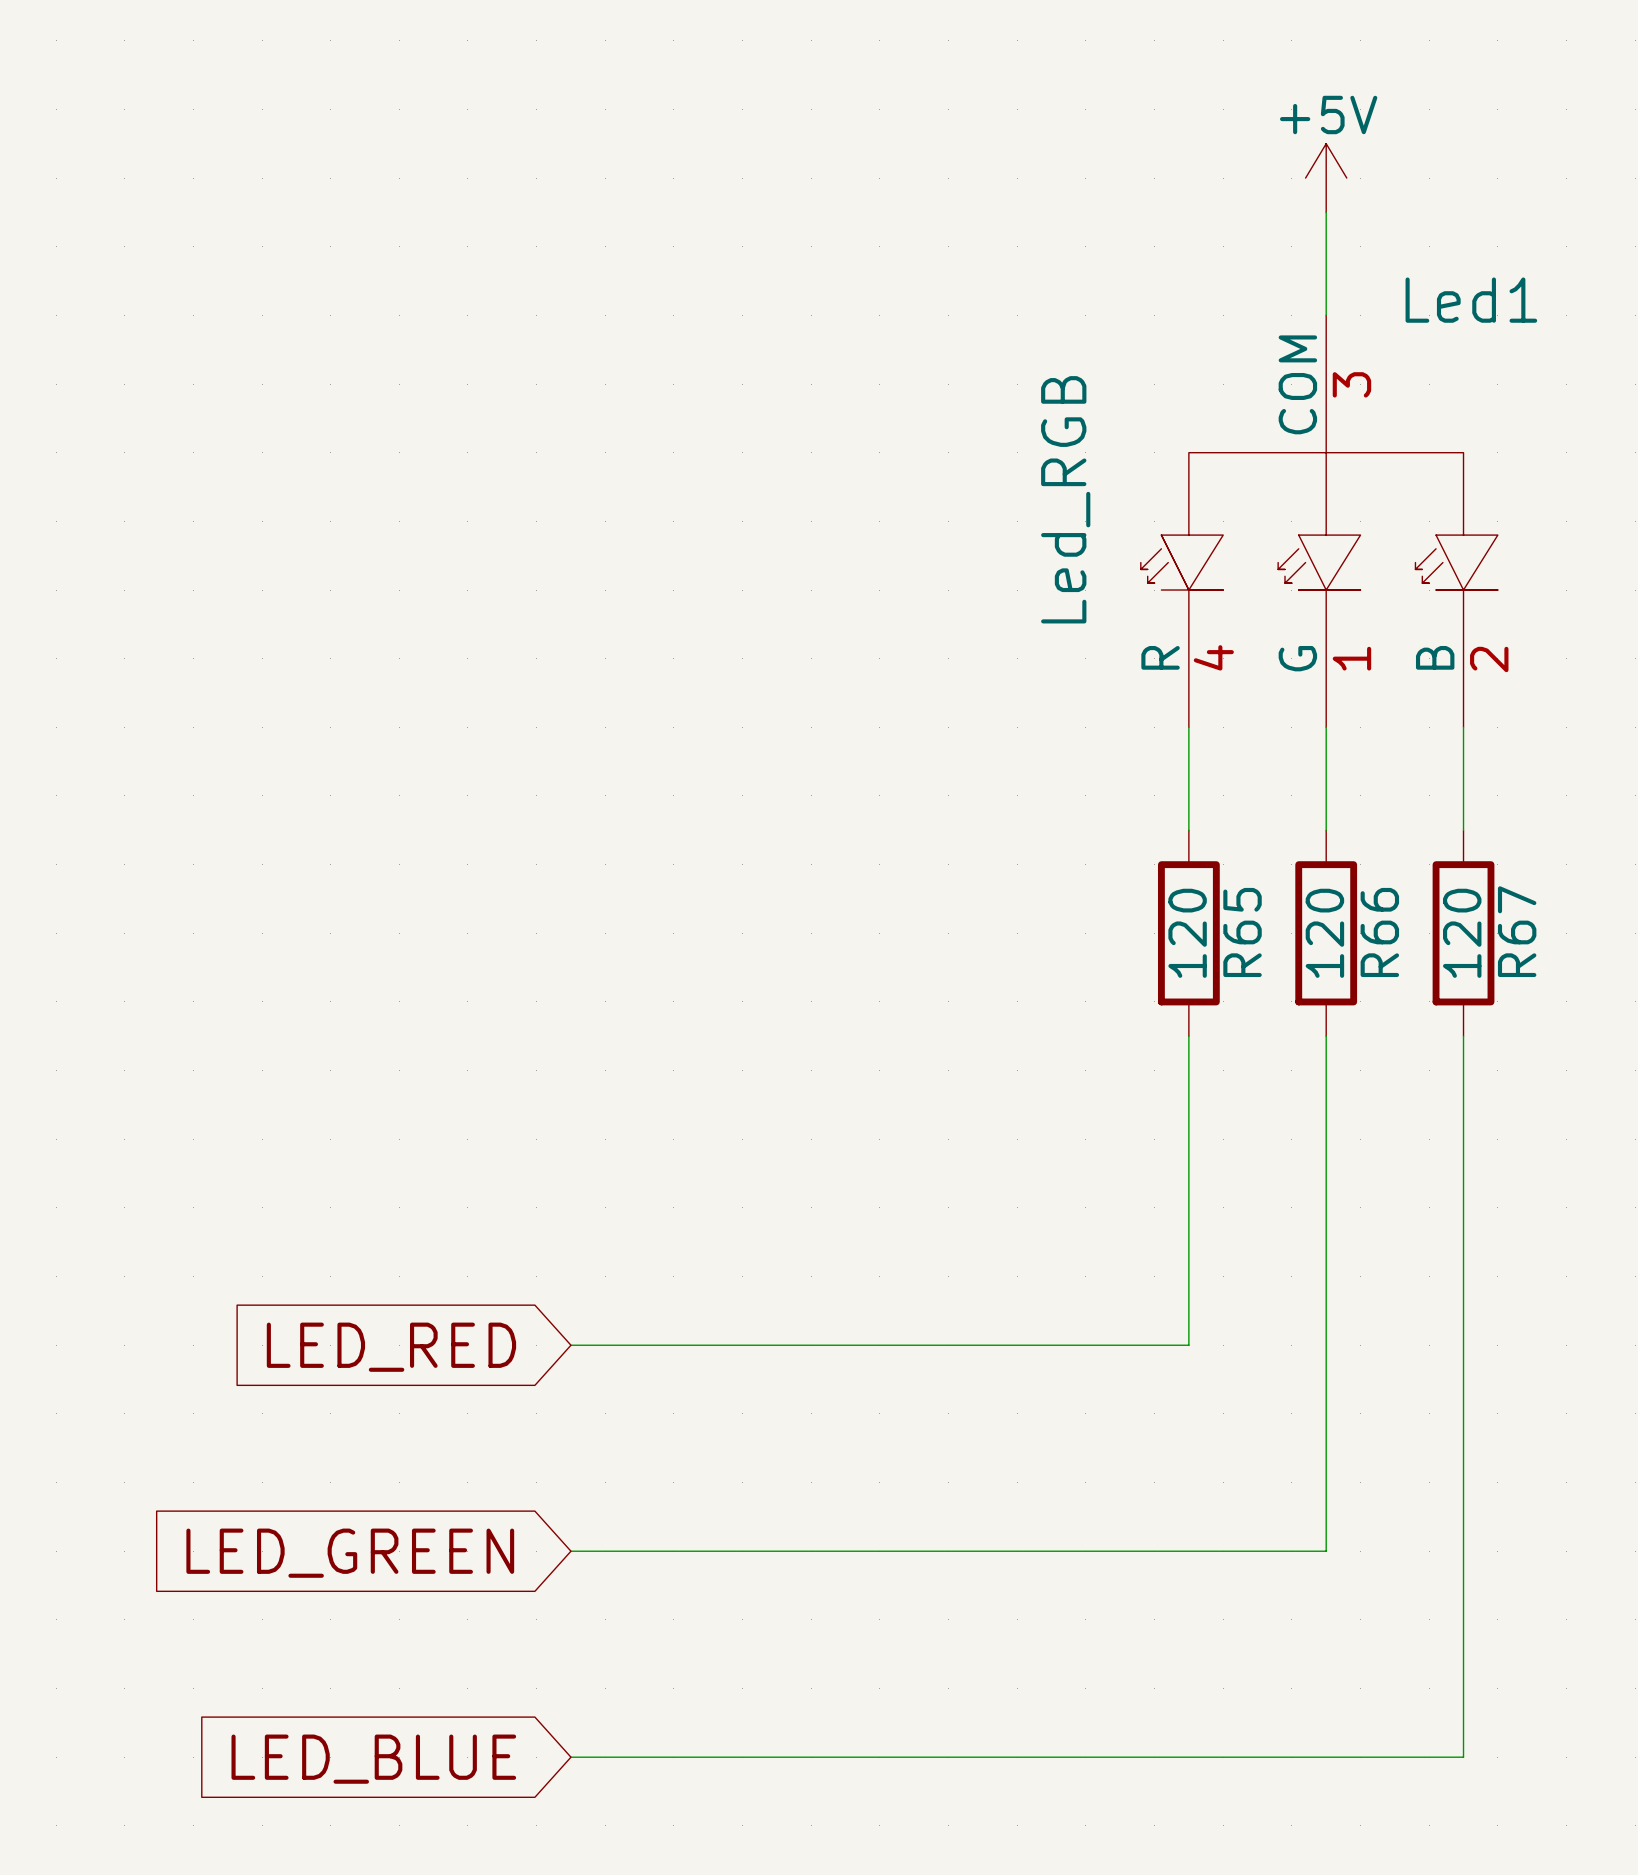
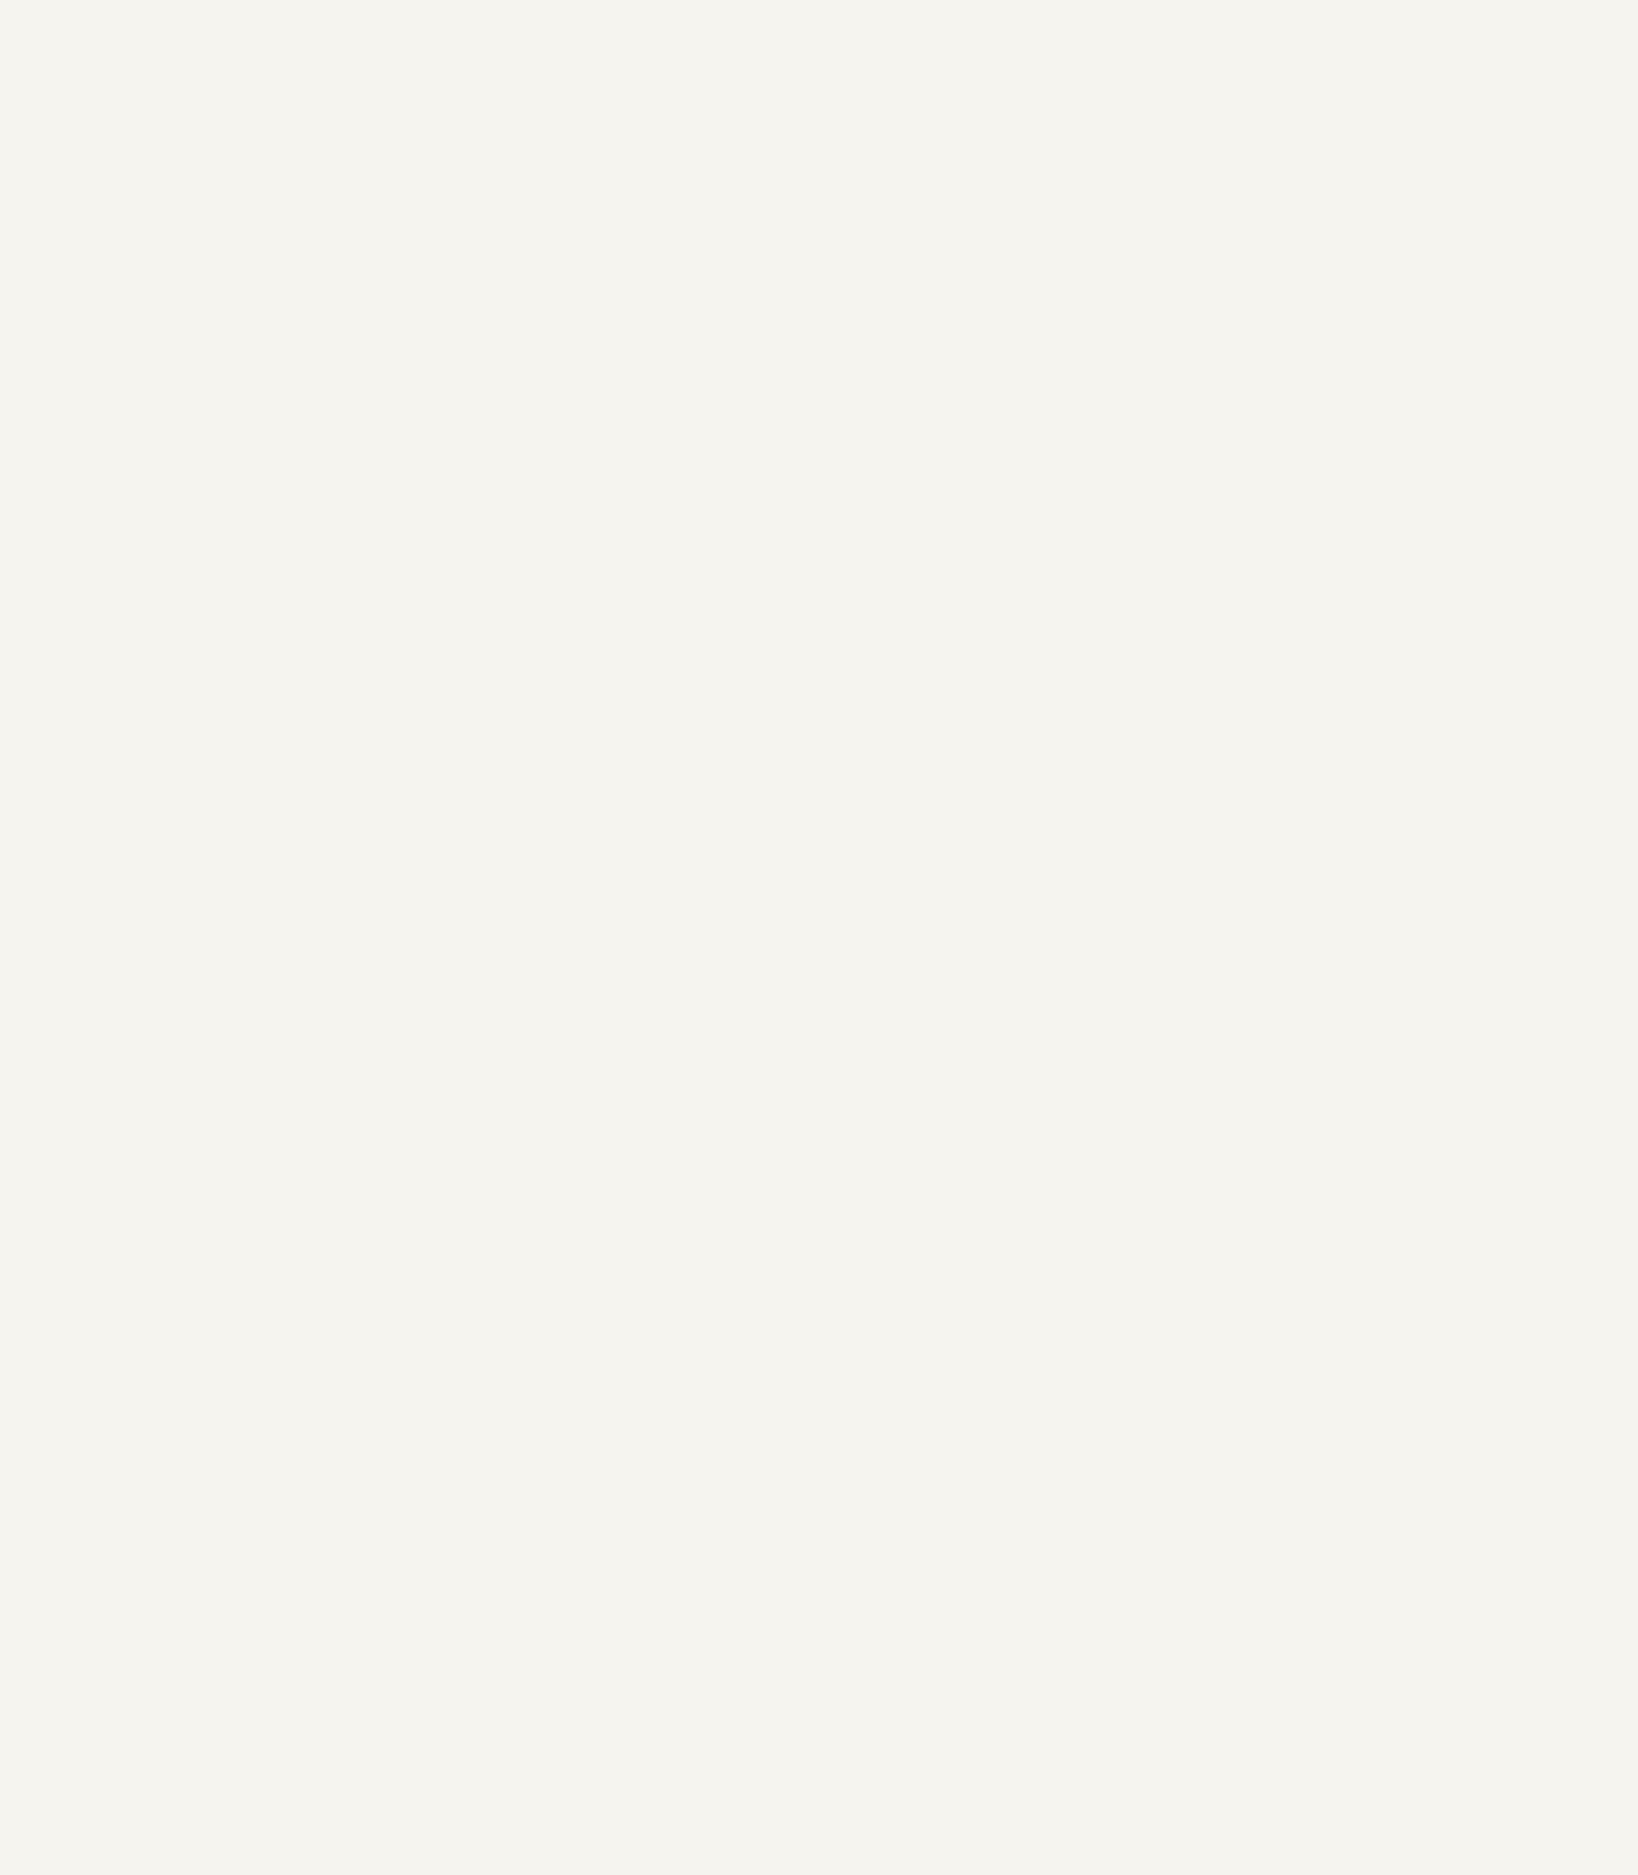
power symbol: +5V (1326, 178) -> none
wire: (1326, 212) (1326, 315) -> none
Led1: Led_RGB (1319, 521) -> none
wire: (1188, 727) (1188, 830) -> none
wire: (1326, 727) (1326, 830) -> none
wire: (1463, 727) (1463, 830) -> none
R65: 120 (1188, 933) -> none
R66: 120 (1326, 933) -> none
R67: 120 (1463, 933) -> none
wire: (1188, 1036) (1188, 1345) (570, 1345) -> none
wire: (1326, 1036) (1326, 1551) (570, 1551) -> none
wire: (1463, 1036) (1463, 1757) (570, 1757) -> none
global label: LED_RED (391, 1347) -> none
global label: LED_GREEN (350, 1553) -> none
global label: LED_BLUE (373, 1759) -> none

